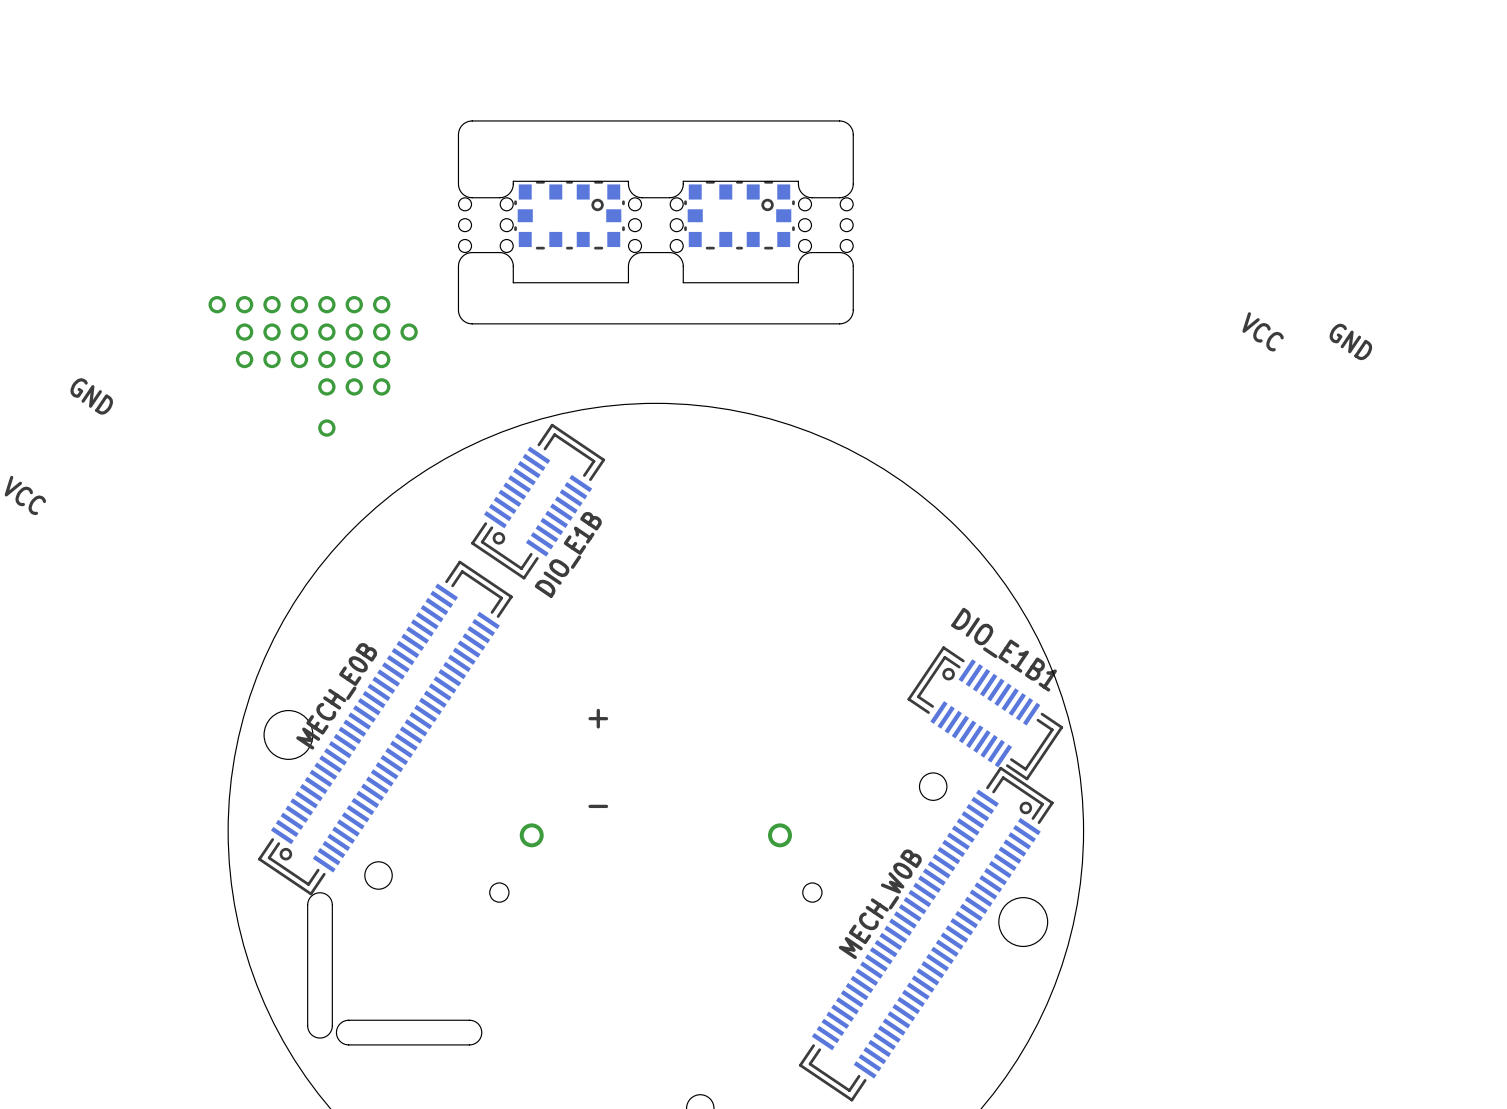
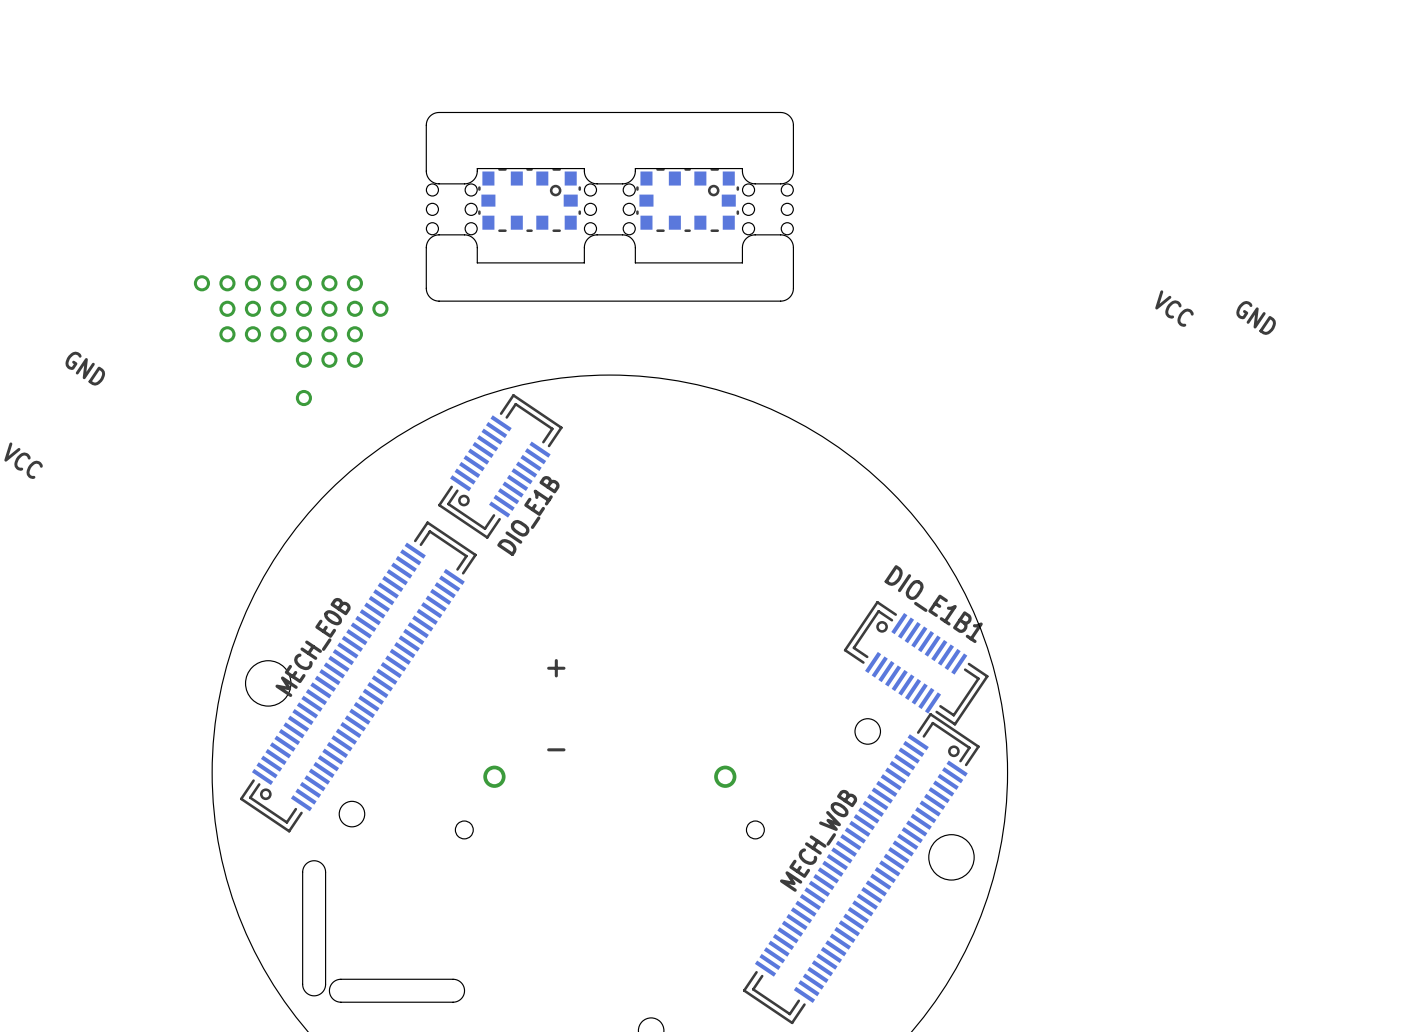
part position: (320, 965) -> (314, 928)
part position: (409, 1032) -> (396, 990)

